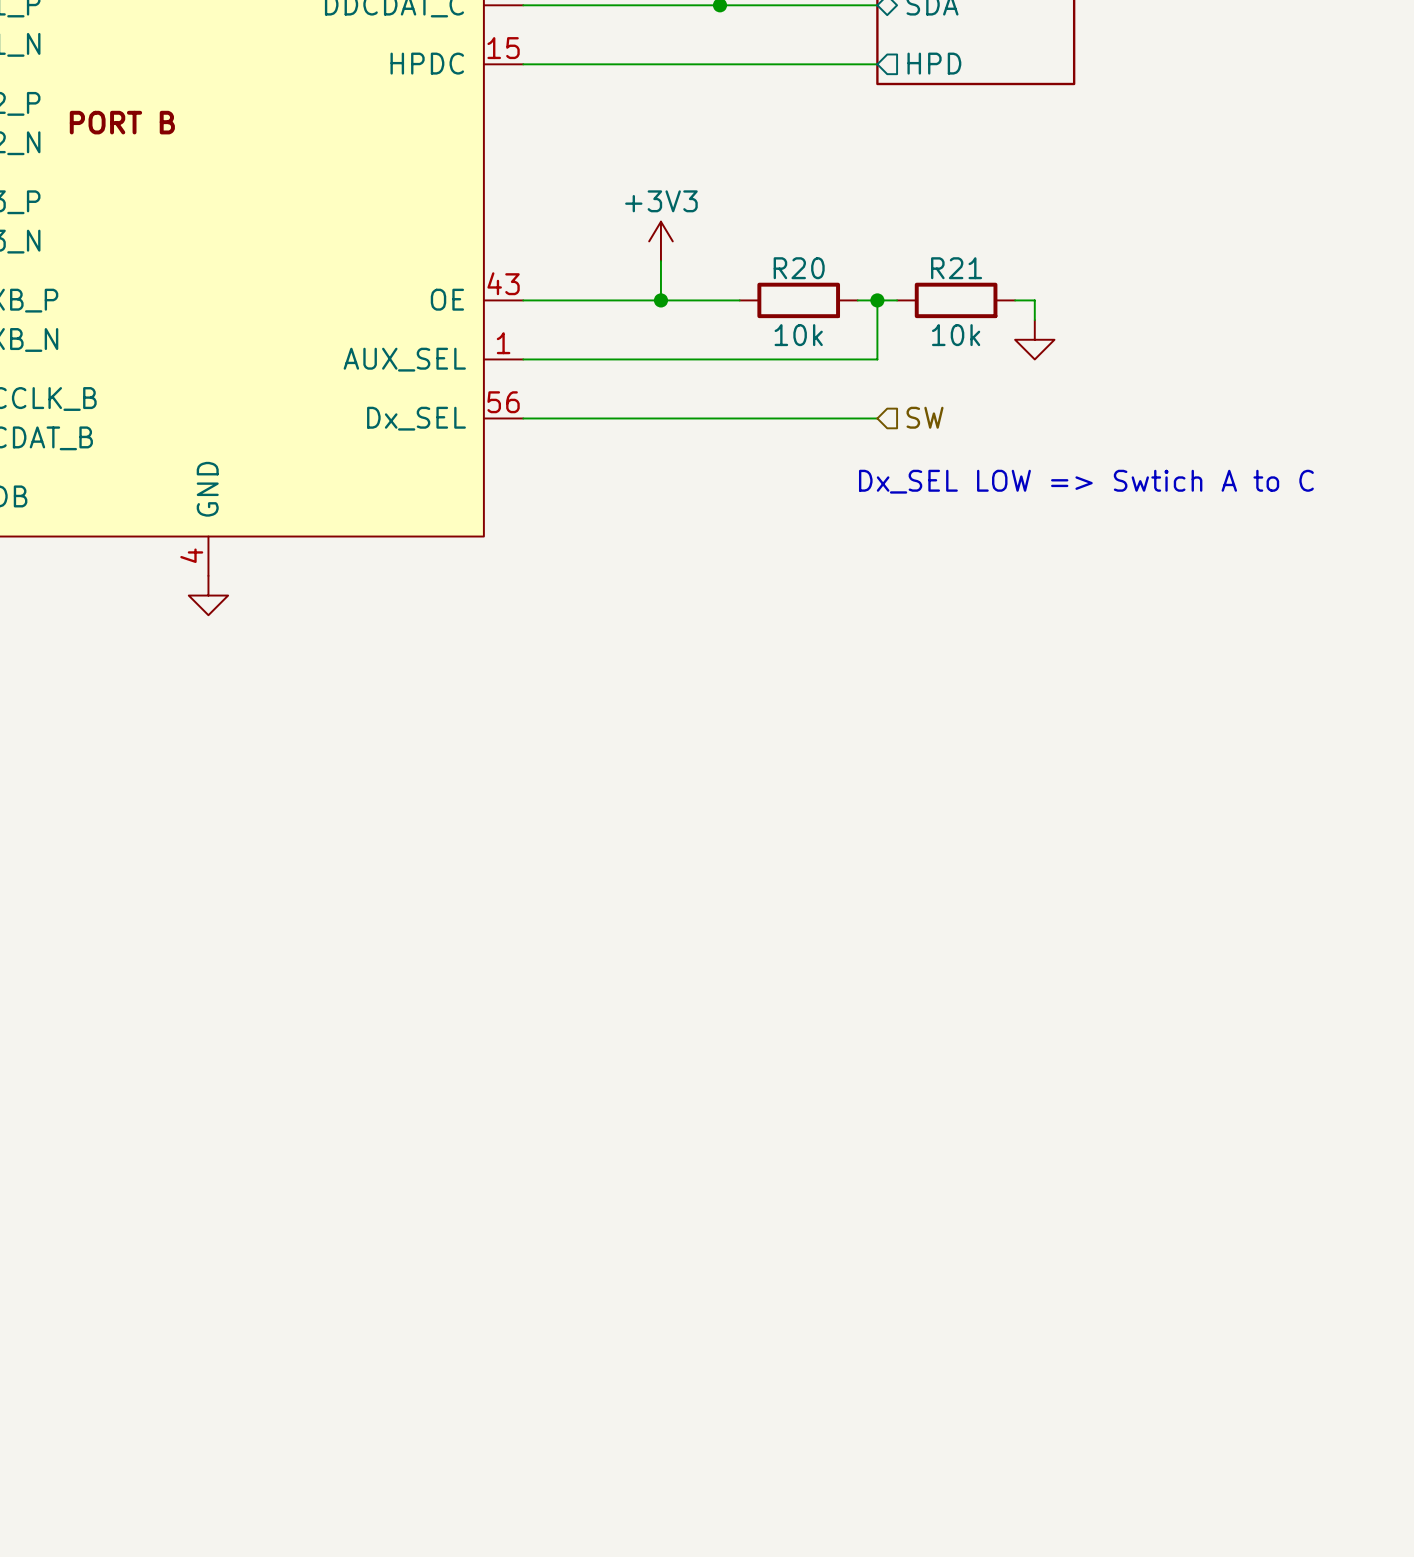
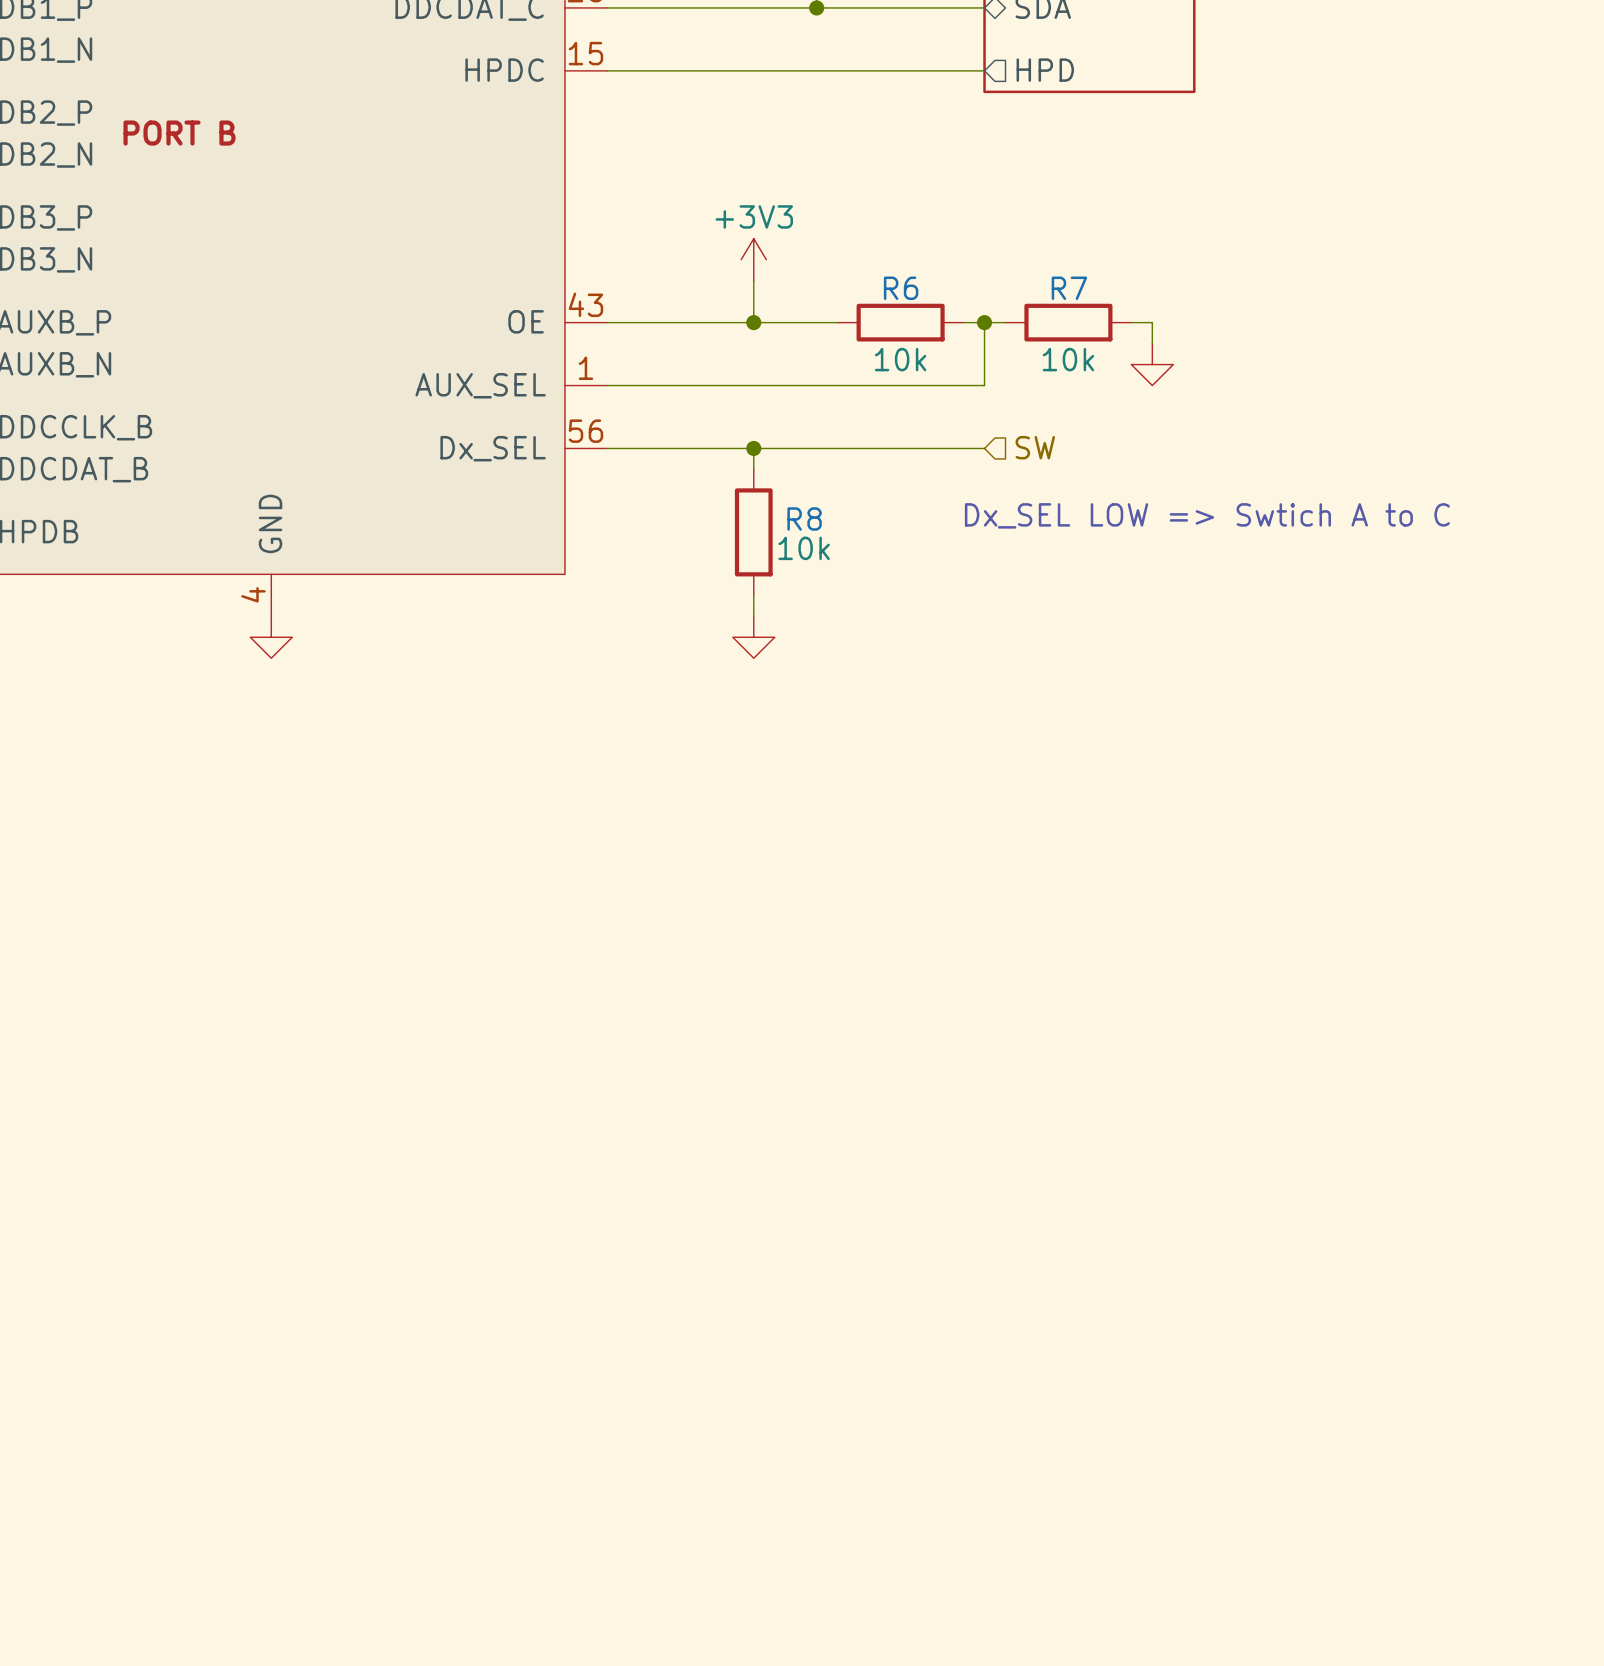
R20 name: R20 (799, 268) -> R6 (901, 288)
R21 name: R21 (956, 268) -> R7 (1069, 288)
wire: none -> (753, 448) (753, 469)
junction: none -> (753, 448)
R8: none -> 10k (753, 532)
wire: none -> (753, 595) (753, 616)
power symbol: none -> (753, 637)

